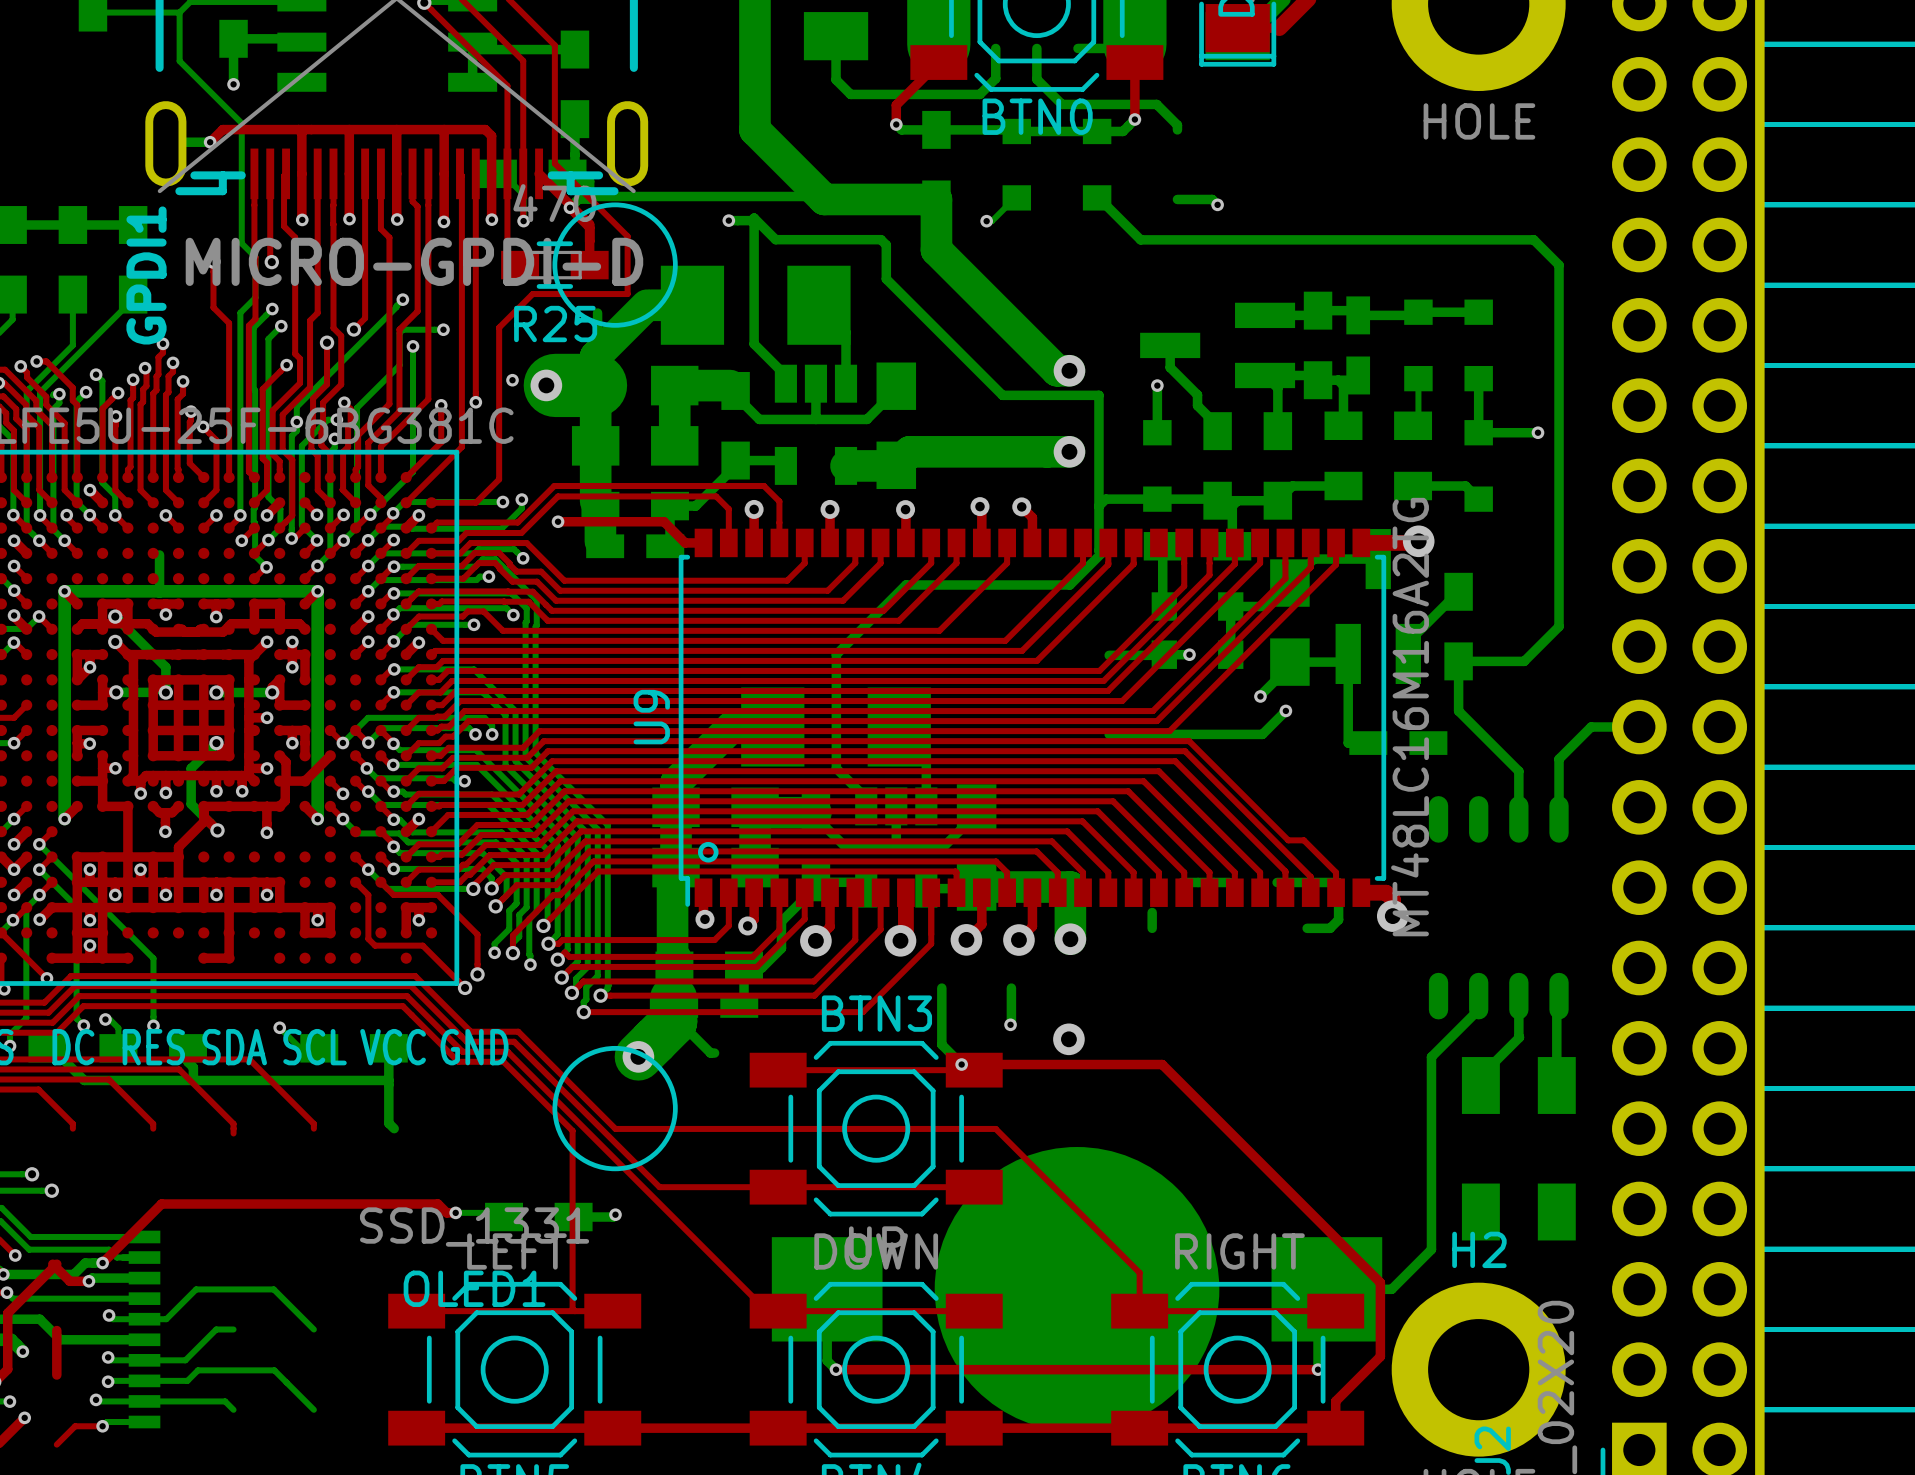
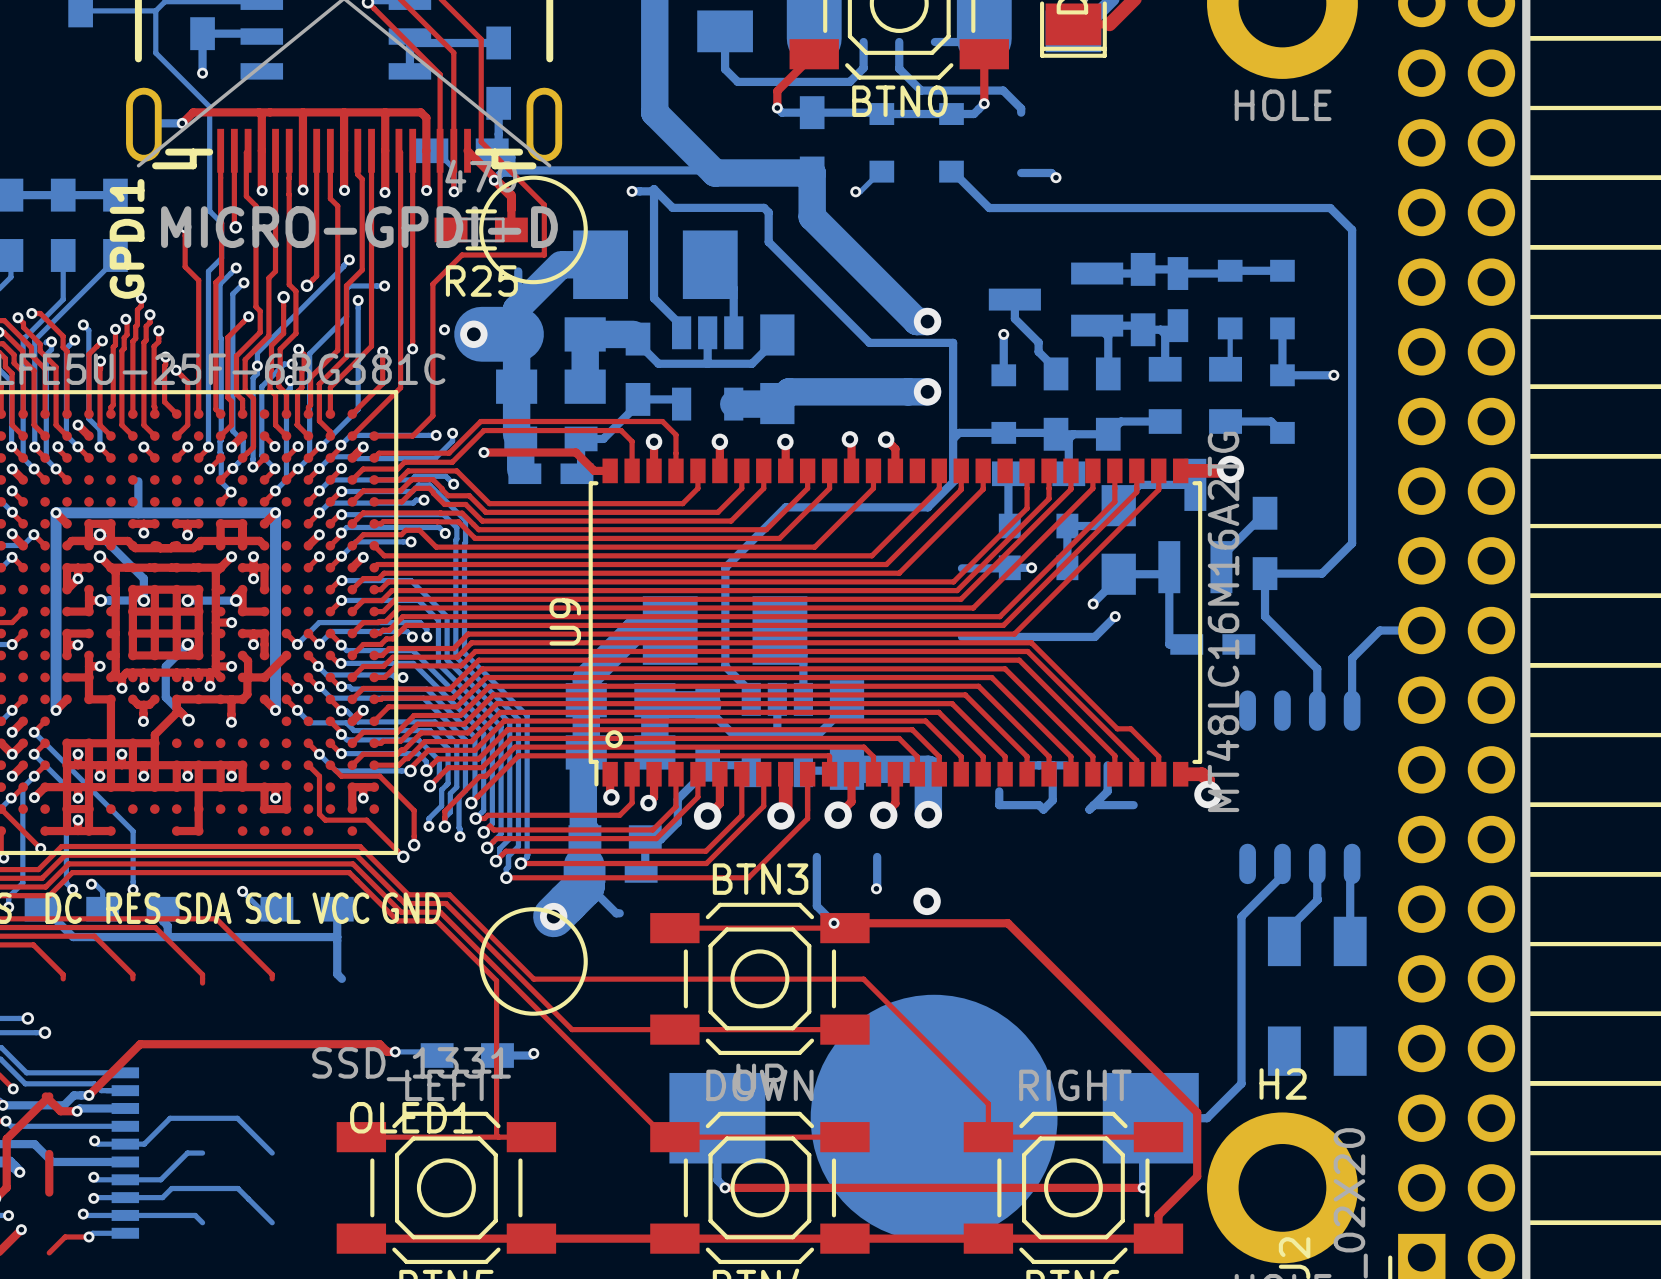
bottom track: none -> (1052, 765) (1052, 800) (1043, 809) (1039, 805) (999, 805)
bottom track: (1277, 882) (1338, 883) (1338, 919) (1330, 928) (1307, 928) -> (1093, 805) (1133, 805)
bottom track: none -> (1107, 765) (1107, 791) (1089, 809)

